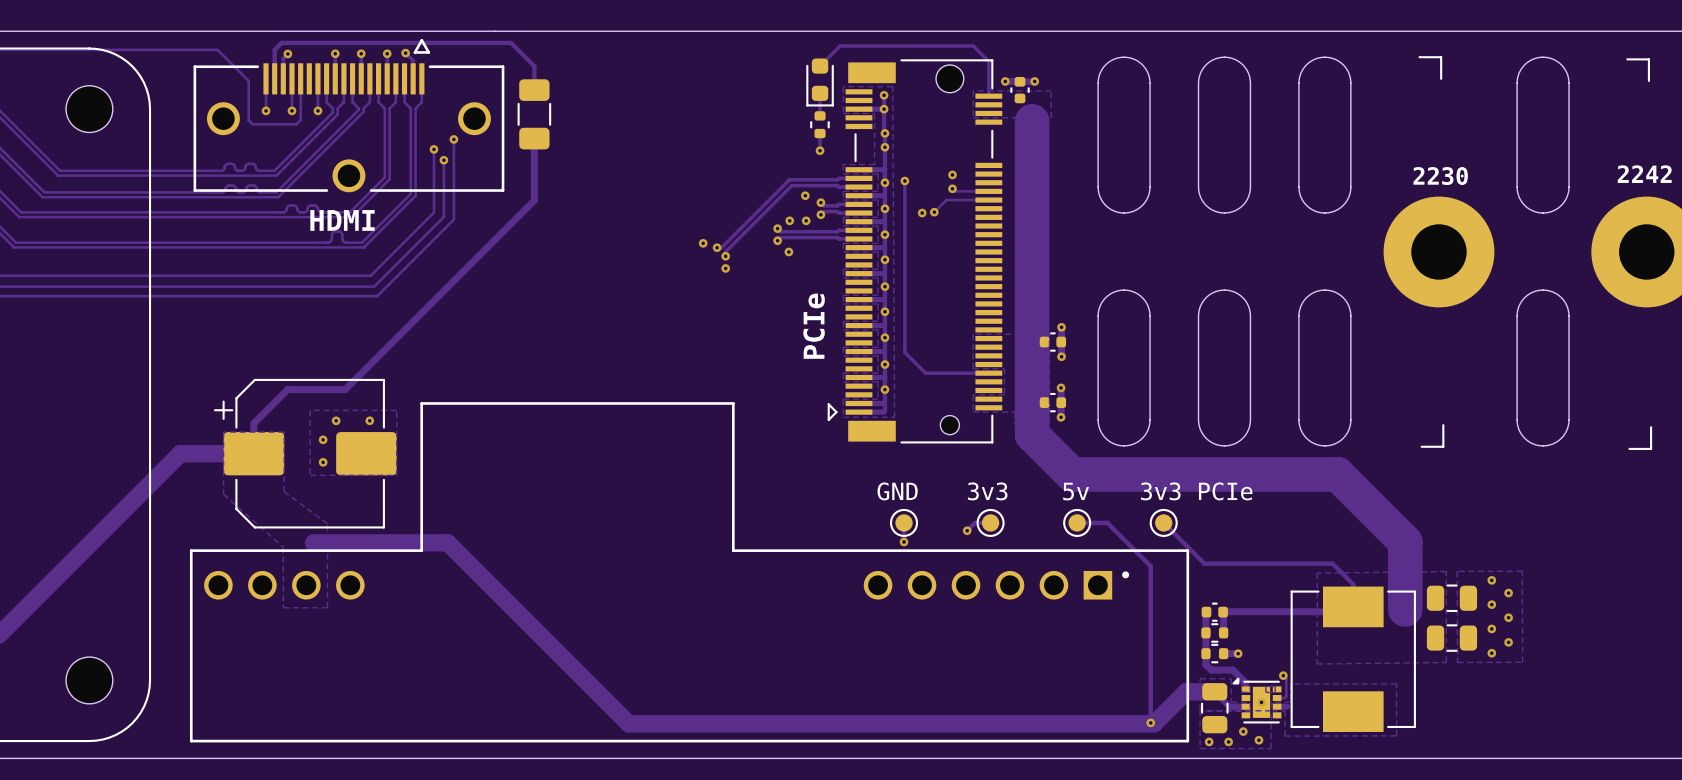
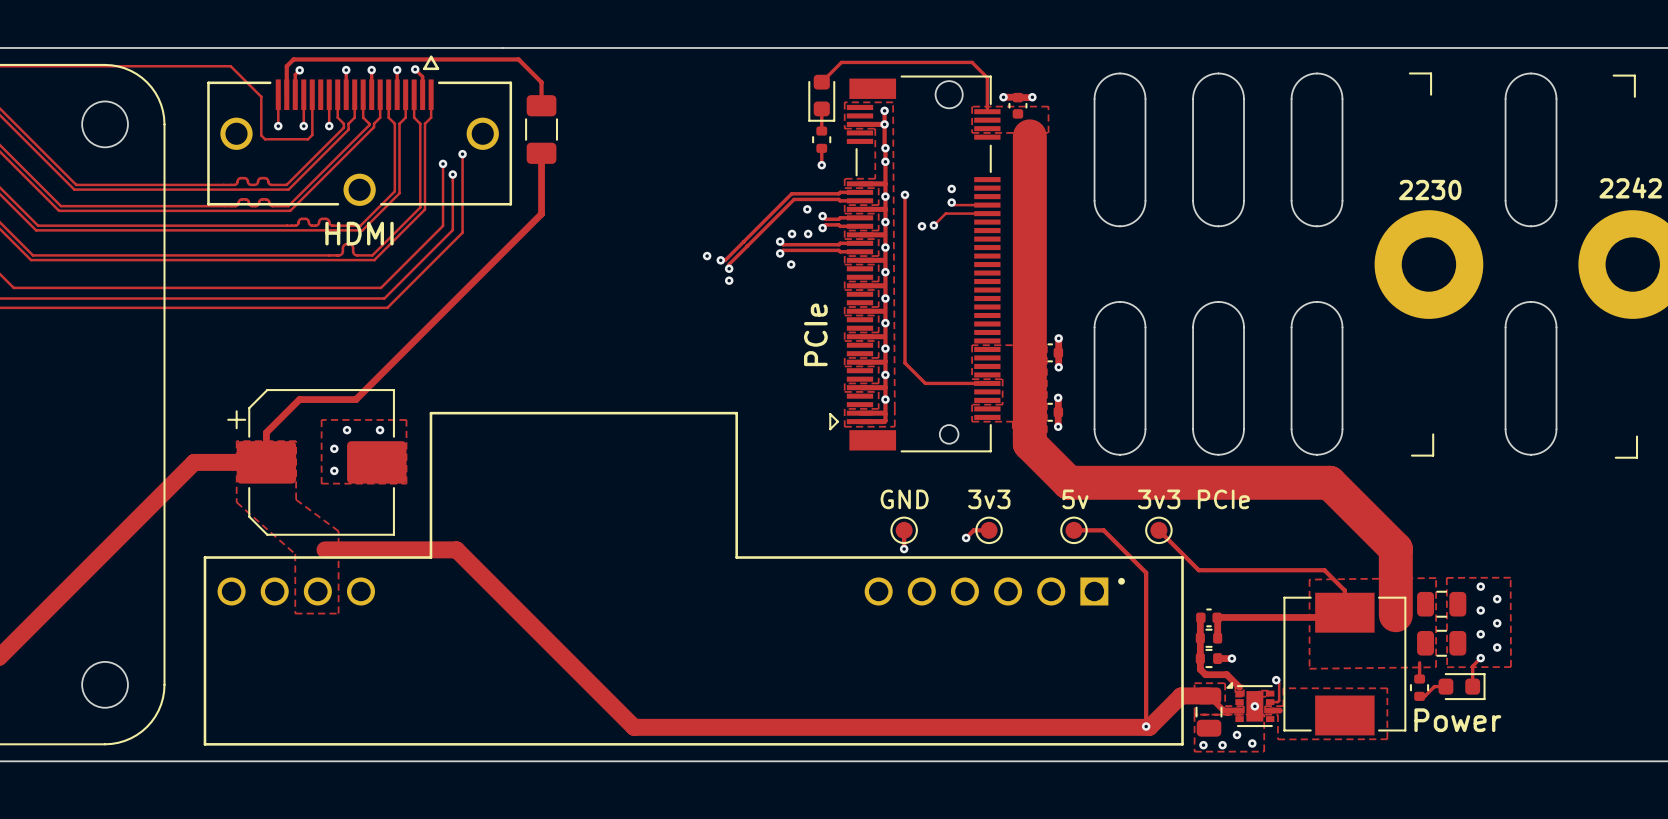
track: none -> (1480, 658) (1472, 666) (1472, 686)
track: none -> (1419, 662) (1419, 679)
track: none -> (1445, 686) (1434, 686) (1424, 696) (1419, 696)
part: none -> (1462, 686)
part: none -> (1419, 687)
text: none -> Power (1457, 720)

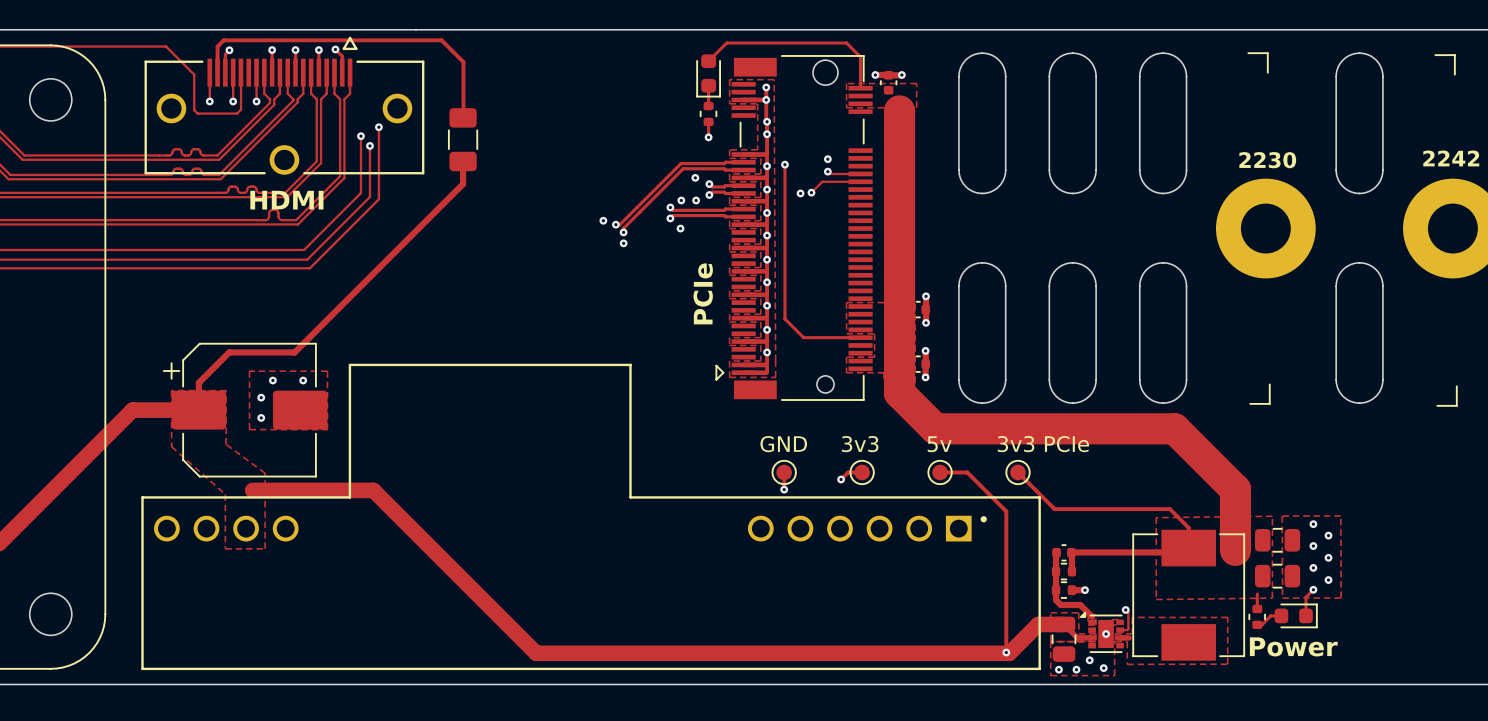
track: (518, 59) (541, 82) (541, 105) -> (430, 40) (441, 40) (463, 62) (463, 117)
part position: (541, 129) -> (463, 139)
track: (541, 153) (541, 214) (355, 399) -> (463, 161) (463, 184) (294, 352) (281, 352)

